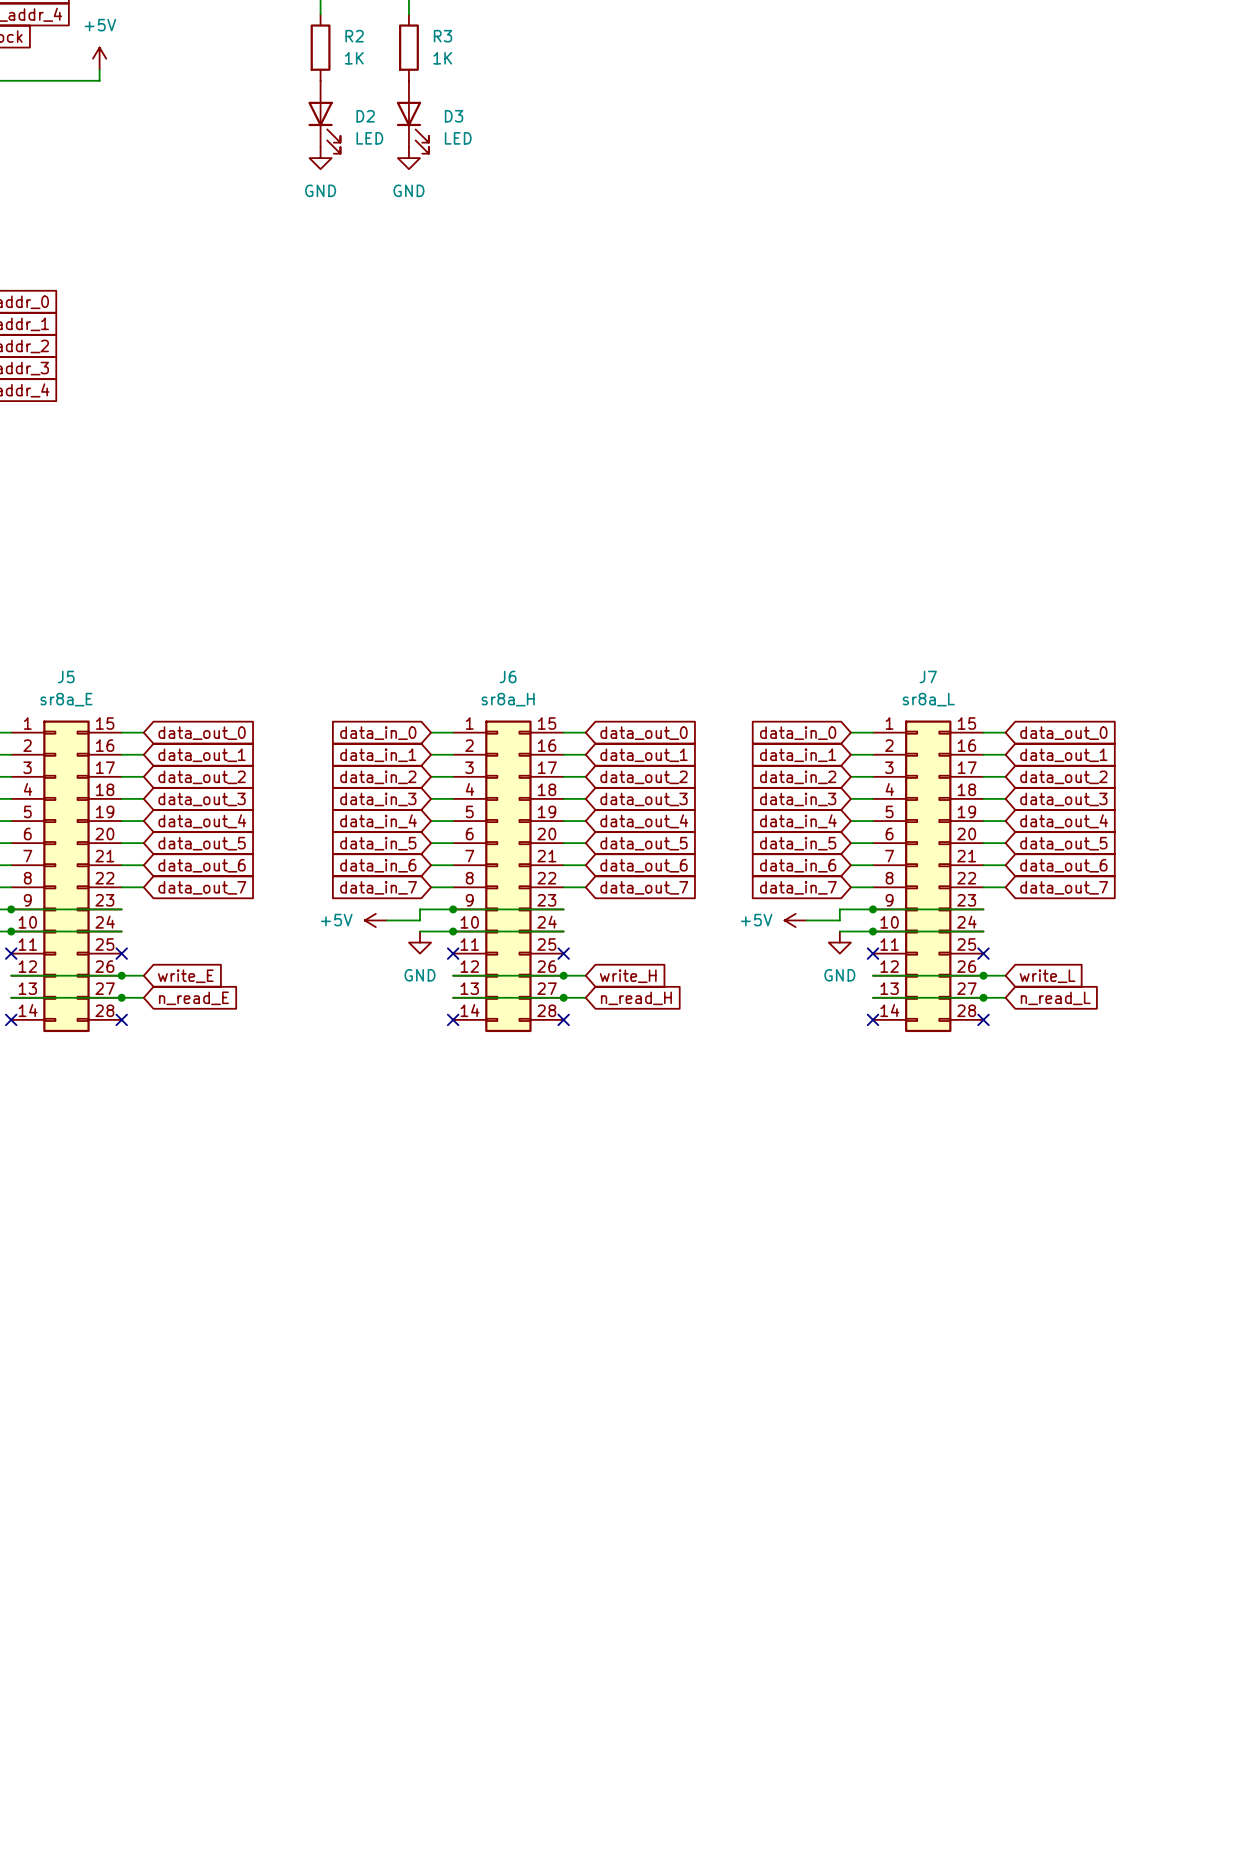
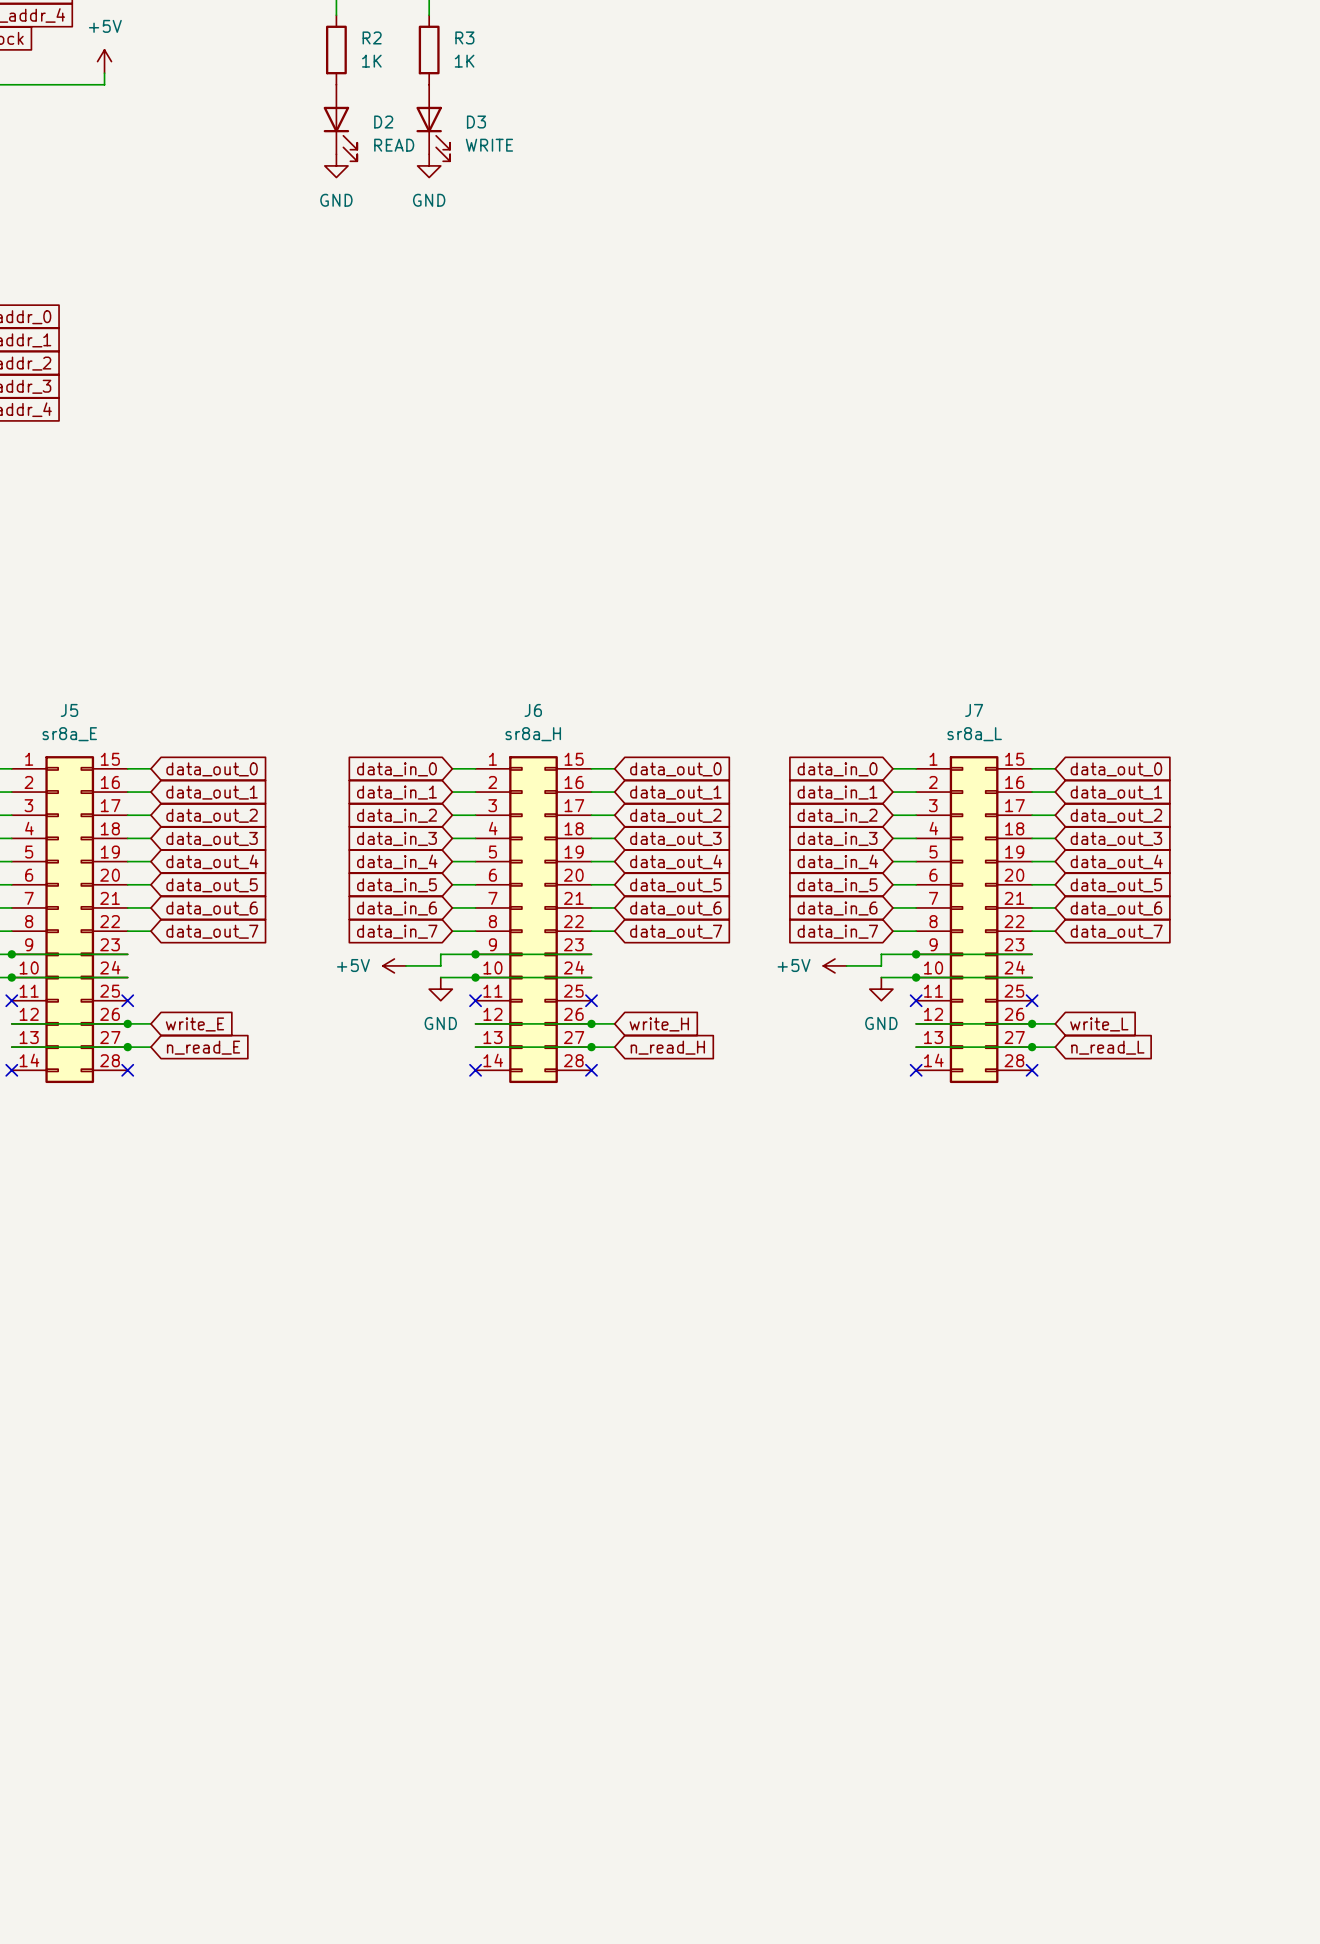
D2 value: LED (369, 138) -> READ (394, 145)
D3 value: LED (458, 138) -> WRITE (489, 145)

